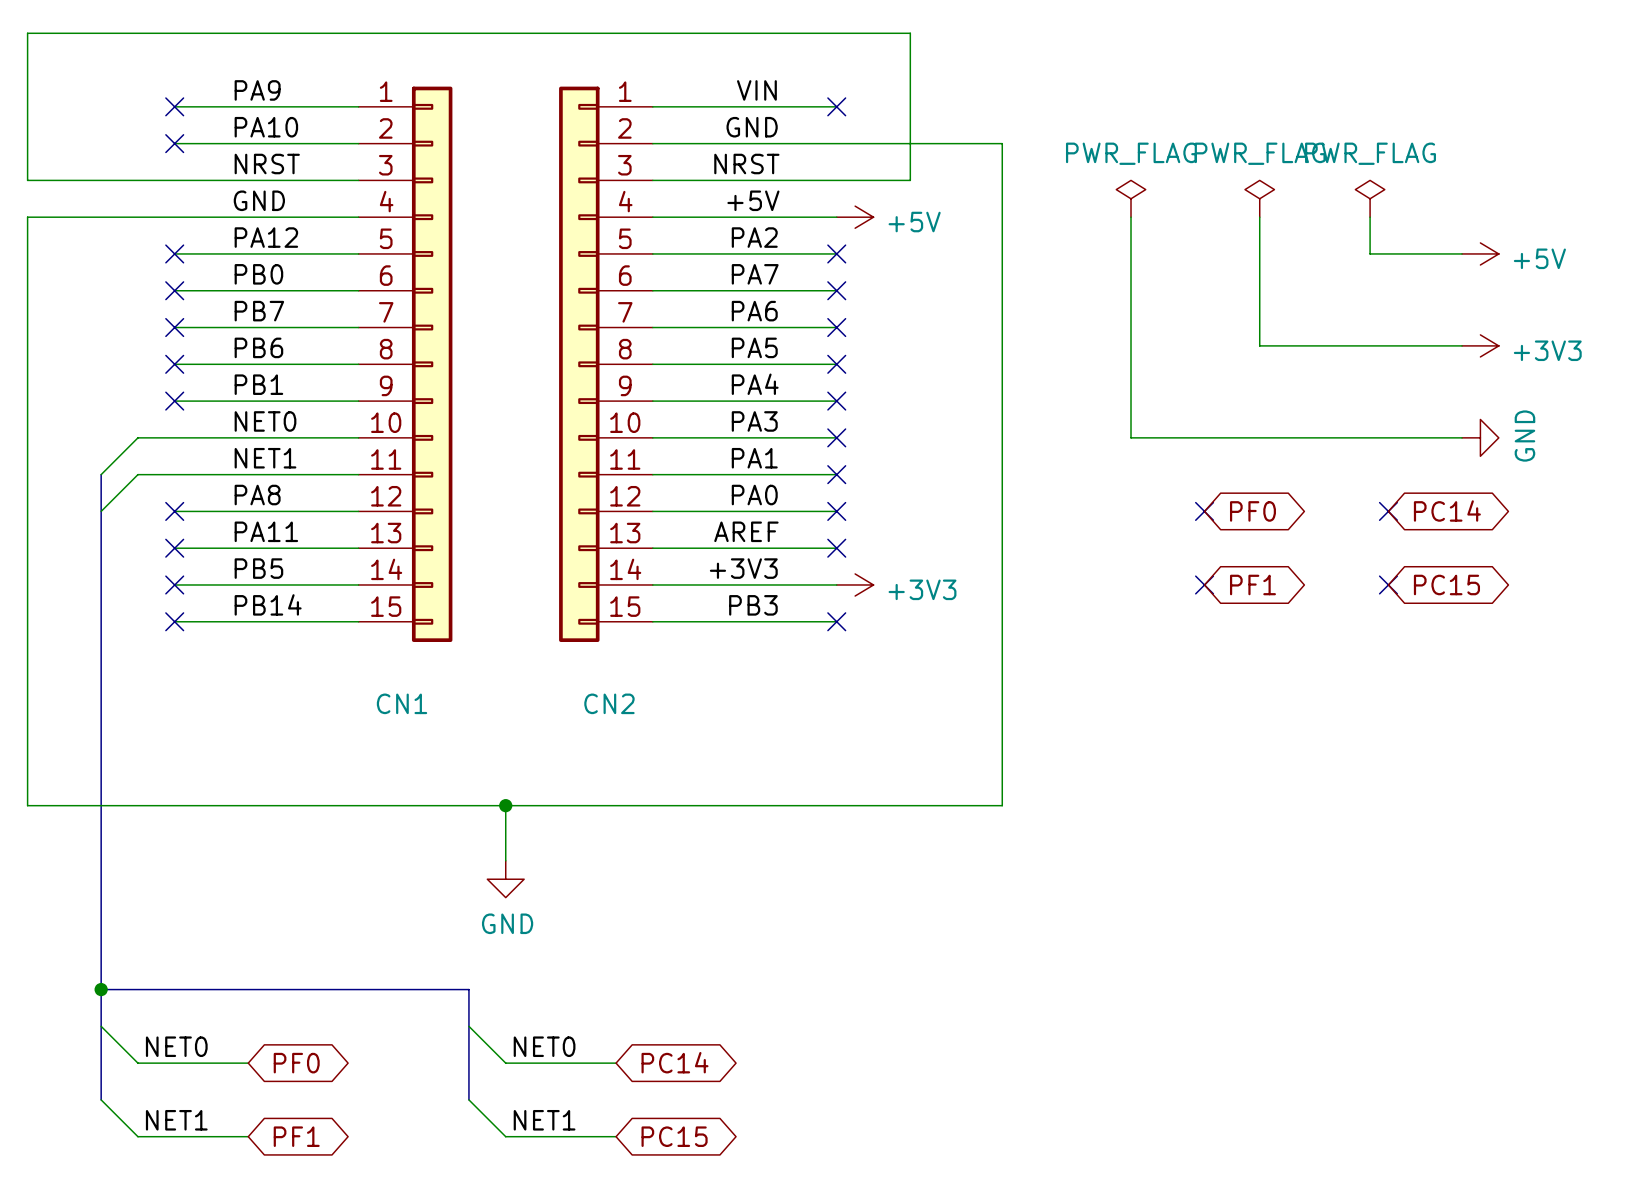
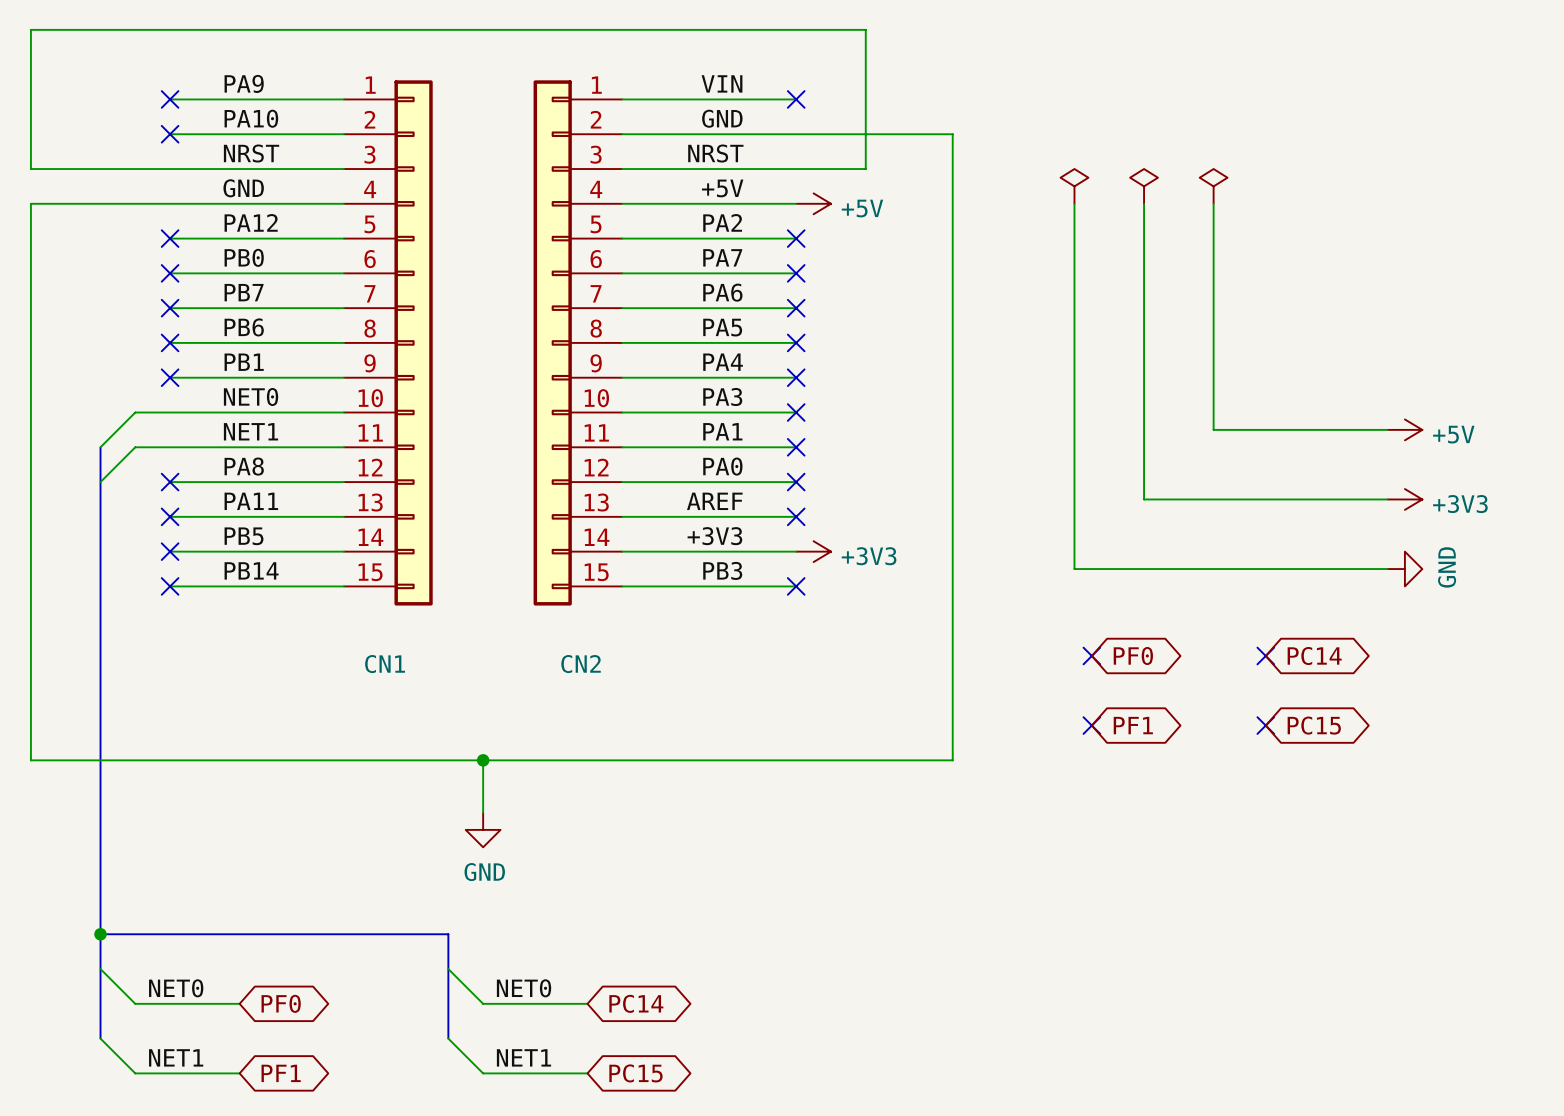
power symbol text: PWR_FLAG (1131, 153) -> none
power symbol: none -> (1144, 186)
power symbol: PWR_FLAG (1259, 198) -> none
power symbol: none -> (1213, 186)
power symbol: PWR_FLAG (1370, 198) -> none
wire: none -> (1144, 203) (1144, 499) (1387, 499)
wire: (1259, 217) (1259, 345) (1462, 345) -> none
wire: none -> (1213, 203) (1213, 429) (1387, 429)
wire: (1370, 217) (1370, 253) (1462, 253) -> none
power symbol position: +5V (1480, 253) -> +5V (1404, 429)
power symbol position: +3V3 (1480, 345) -> +3V3 (1404, 499)
wire: (1131, 437) (1462, 437) -> (1074, 412) (1074, 569) (1387, 569)
power symbol position: GND (1480, 437) -> GND (1404, 569)
global label position: PC14 (1447, 510) -> PC14 (1314, 656)
no-connect mark: (1204, 511) -> none
global label position: PF0 (1252, 511) -> PF0 (1133, 656)
no-connect mark: (1388, 511) -> none
no-connect mark: (1204, 584) -> none
global label position: PF1 (1252, 584) -> PF1 (1133, 725)
no-connect mark: (1388, 584) -> none
global label position: PC15 (1446, 584) -> PC15 (1314, 725)
no-connect mark: none -> (1091, 655)
no-connect mark: none -> (1265, 655)
no-connect mark: none -> (1091, 725)
no-connect mark: none -> (1265, 725)

